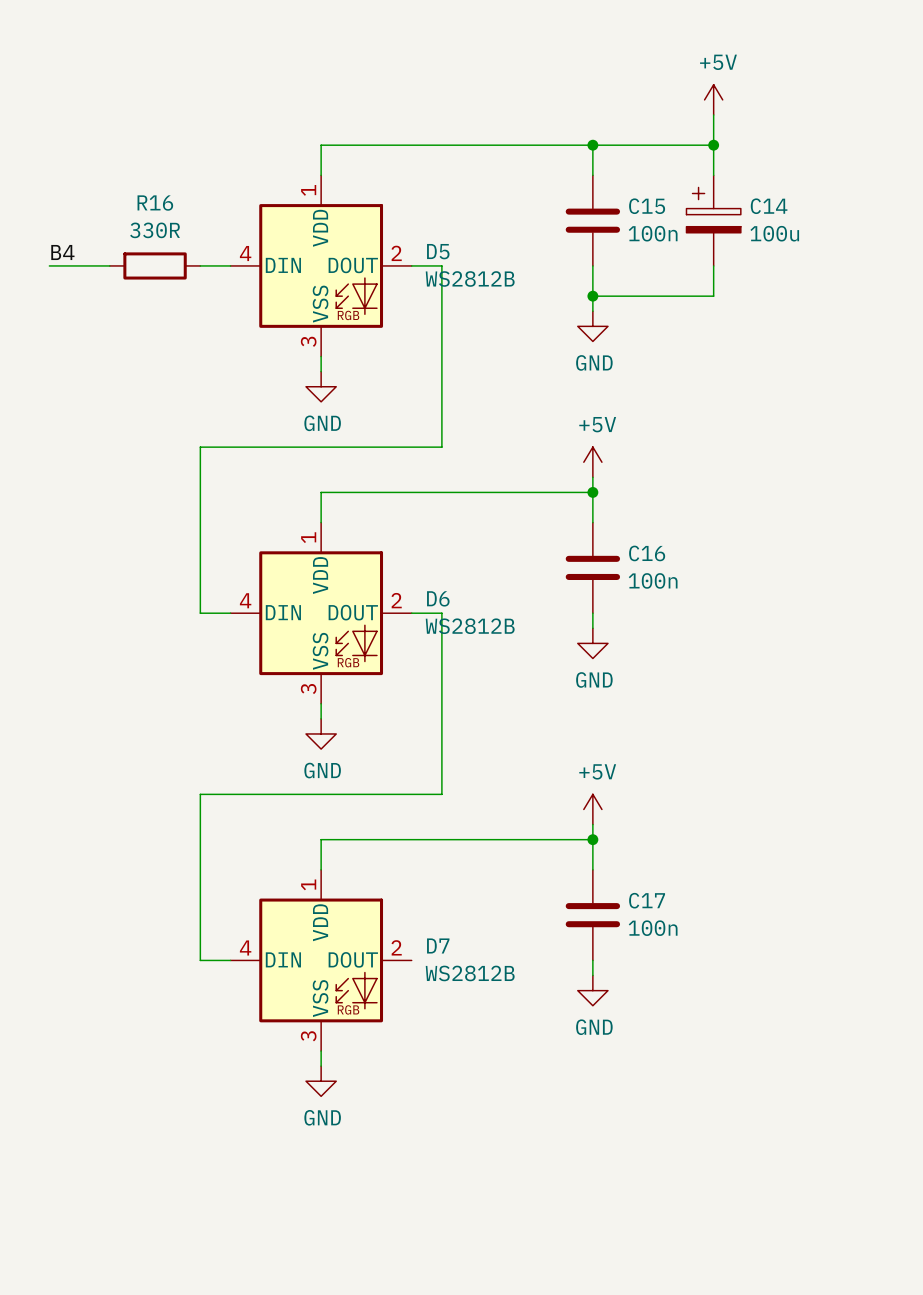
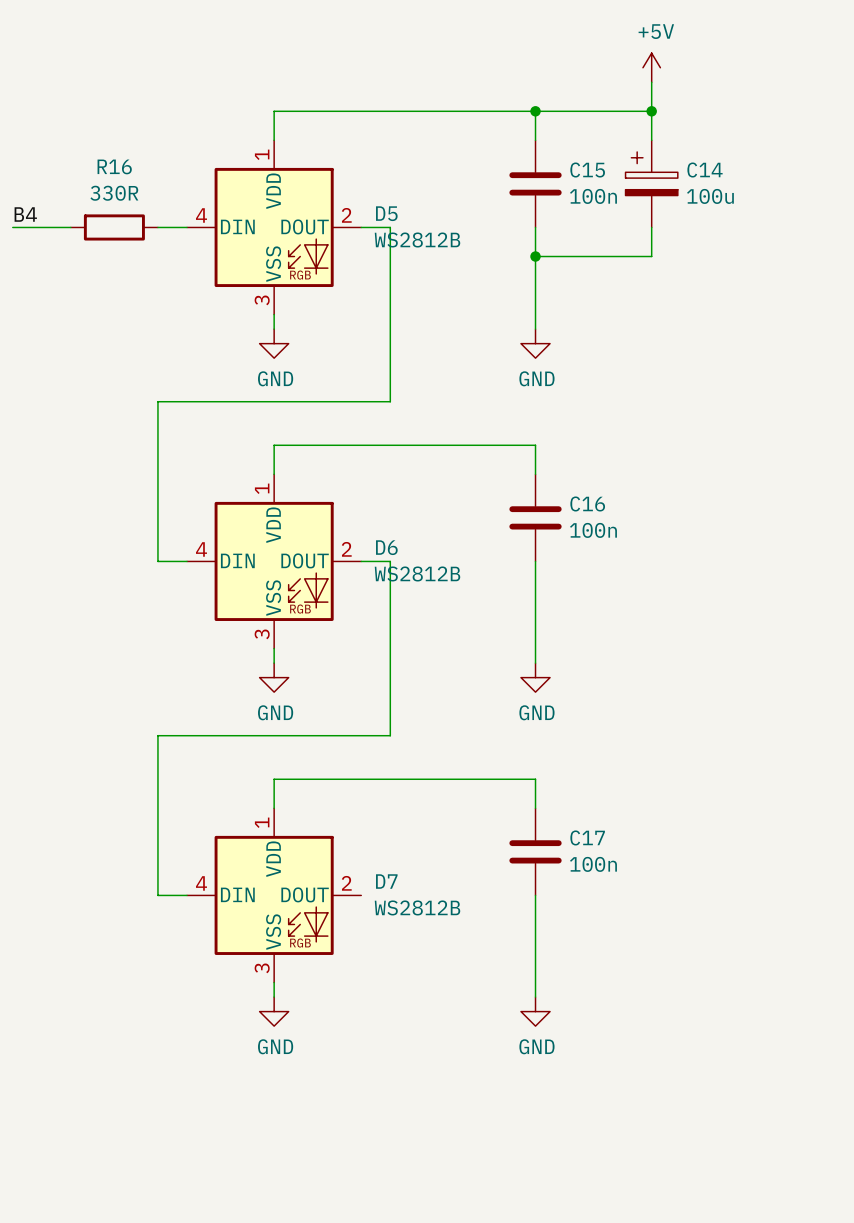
wire: none -> (535, 271) (535, 329)
power symbol position: GND (592, 326) -> GND (535, 343)
power symbol: +5V (592, 462) -> none
wire: (592, 477) (592, 492) -> none
junction: (592, 492) -> none
wire: none -> (535, 575) (535, 663)
power symbol position: GND (592, 643) -> GND (535, 677)
power symbol: +5V (592, 809) -> none
wire: (592, 824) (592, 839) -> none
junction: (592, 839) -> none
wire: none -> (535, 909) (535, 997)
power symbol position: GND (592, 990) -> GND (535, 1011)

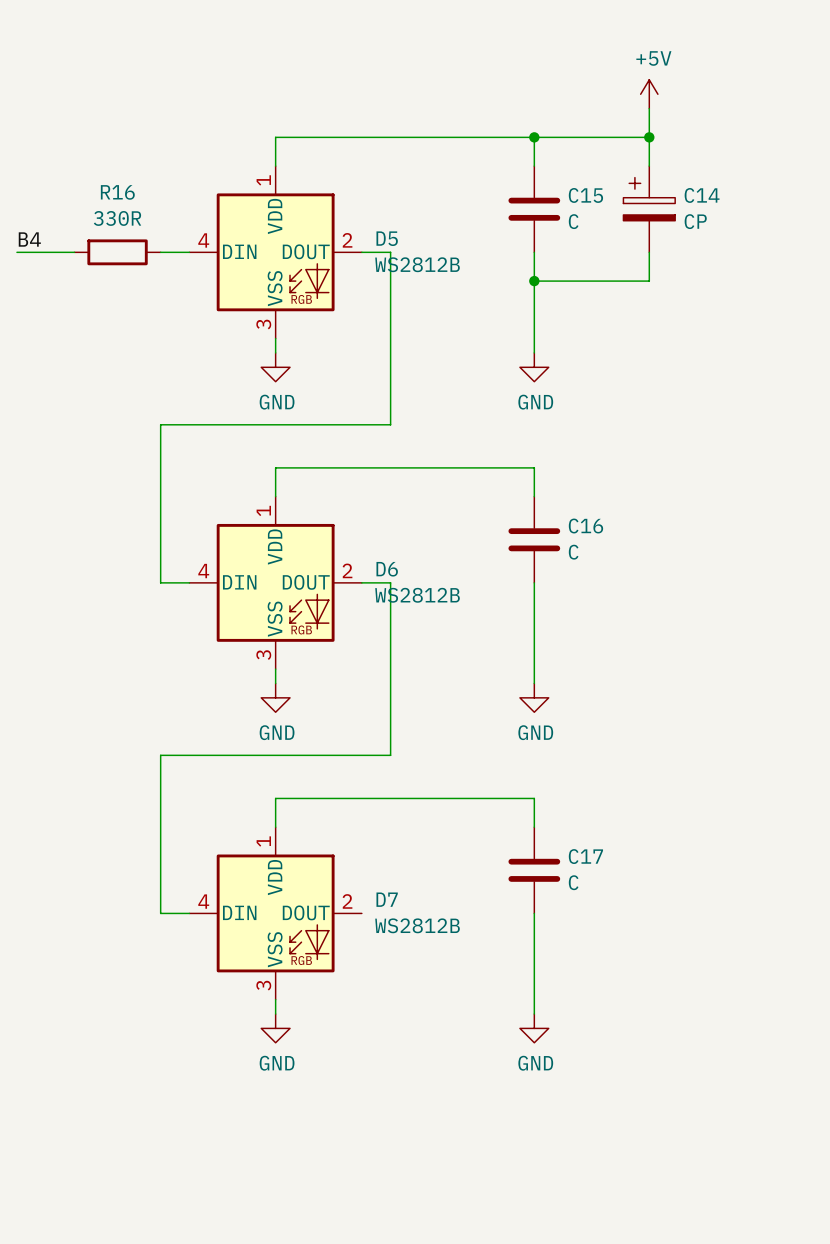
C15 value: 100n (593, 196) -> C (573, 221)
C14 value: 100u (710, 196) -> CP (695, 221)
C16 value: 100n (593, 530) -> C (573, 552)
C17 value: 100n (593, 864) -> C (573, 882)

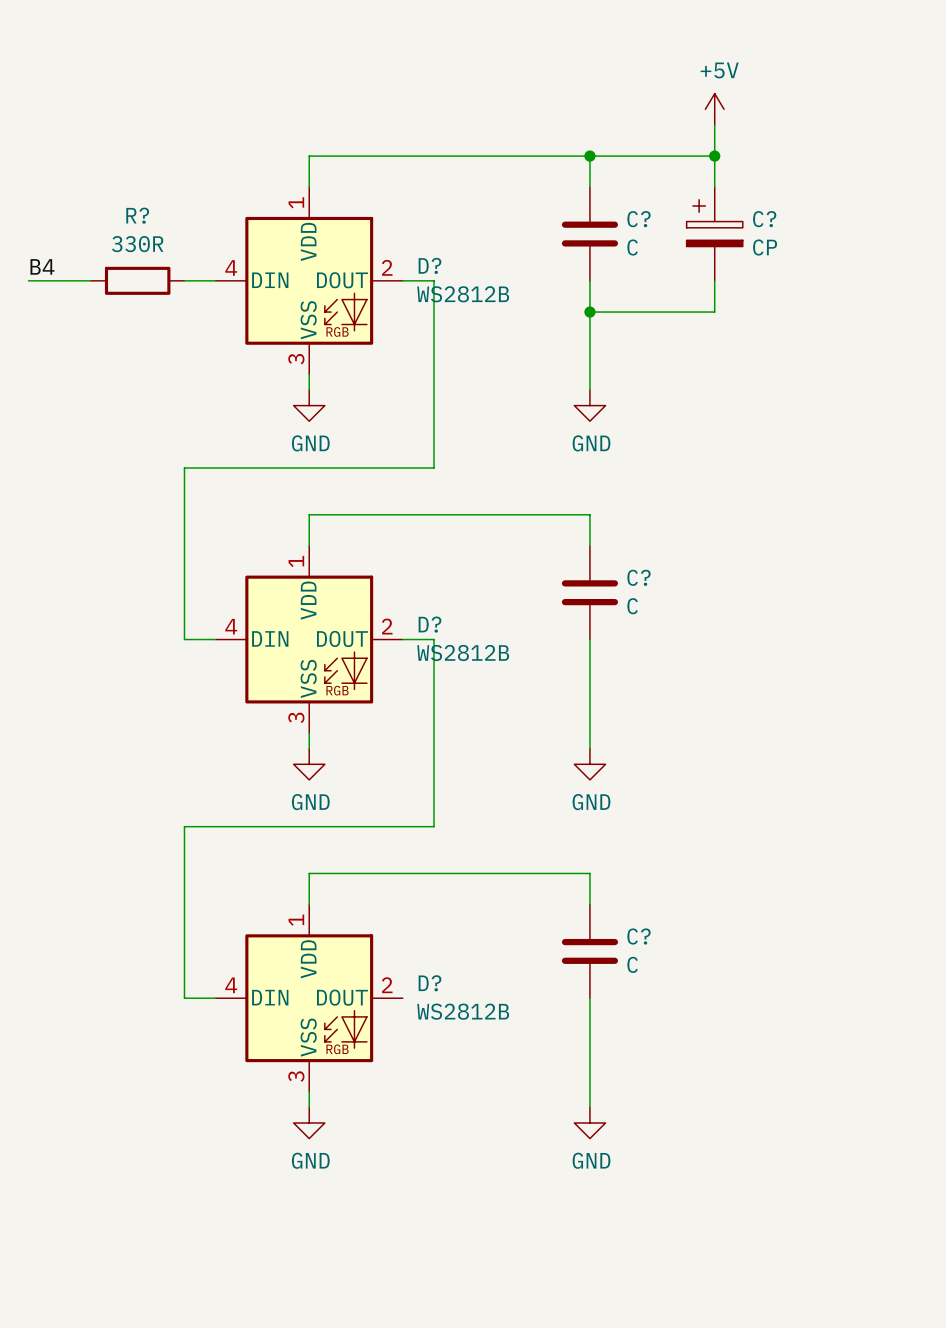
R16 name: R16 (117, 192) -> R? (137, 215)
C15 name: C15 (585, 195) -> C? (639, 219)
C14 name: C14 (702, 195) -> C? (764, 219)
D5 name: D5 (387, 238) -> D? (429, 265)
C16 name: C16 (585, 526) -> C? (639, 577)
D6 name: D6 (387, 569) -> D? (429, 624)
C17 name: C17 (585, 856) -> C? (639, 936)
D7 name: D7 (387, 899) -> D? (429, 983)

